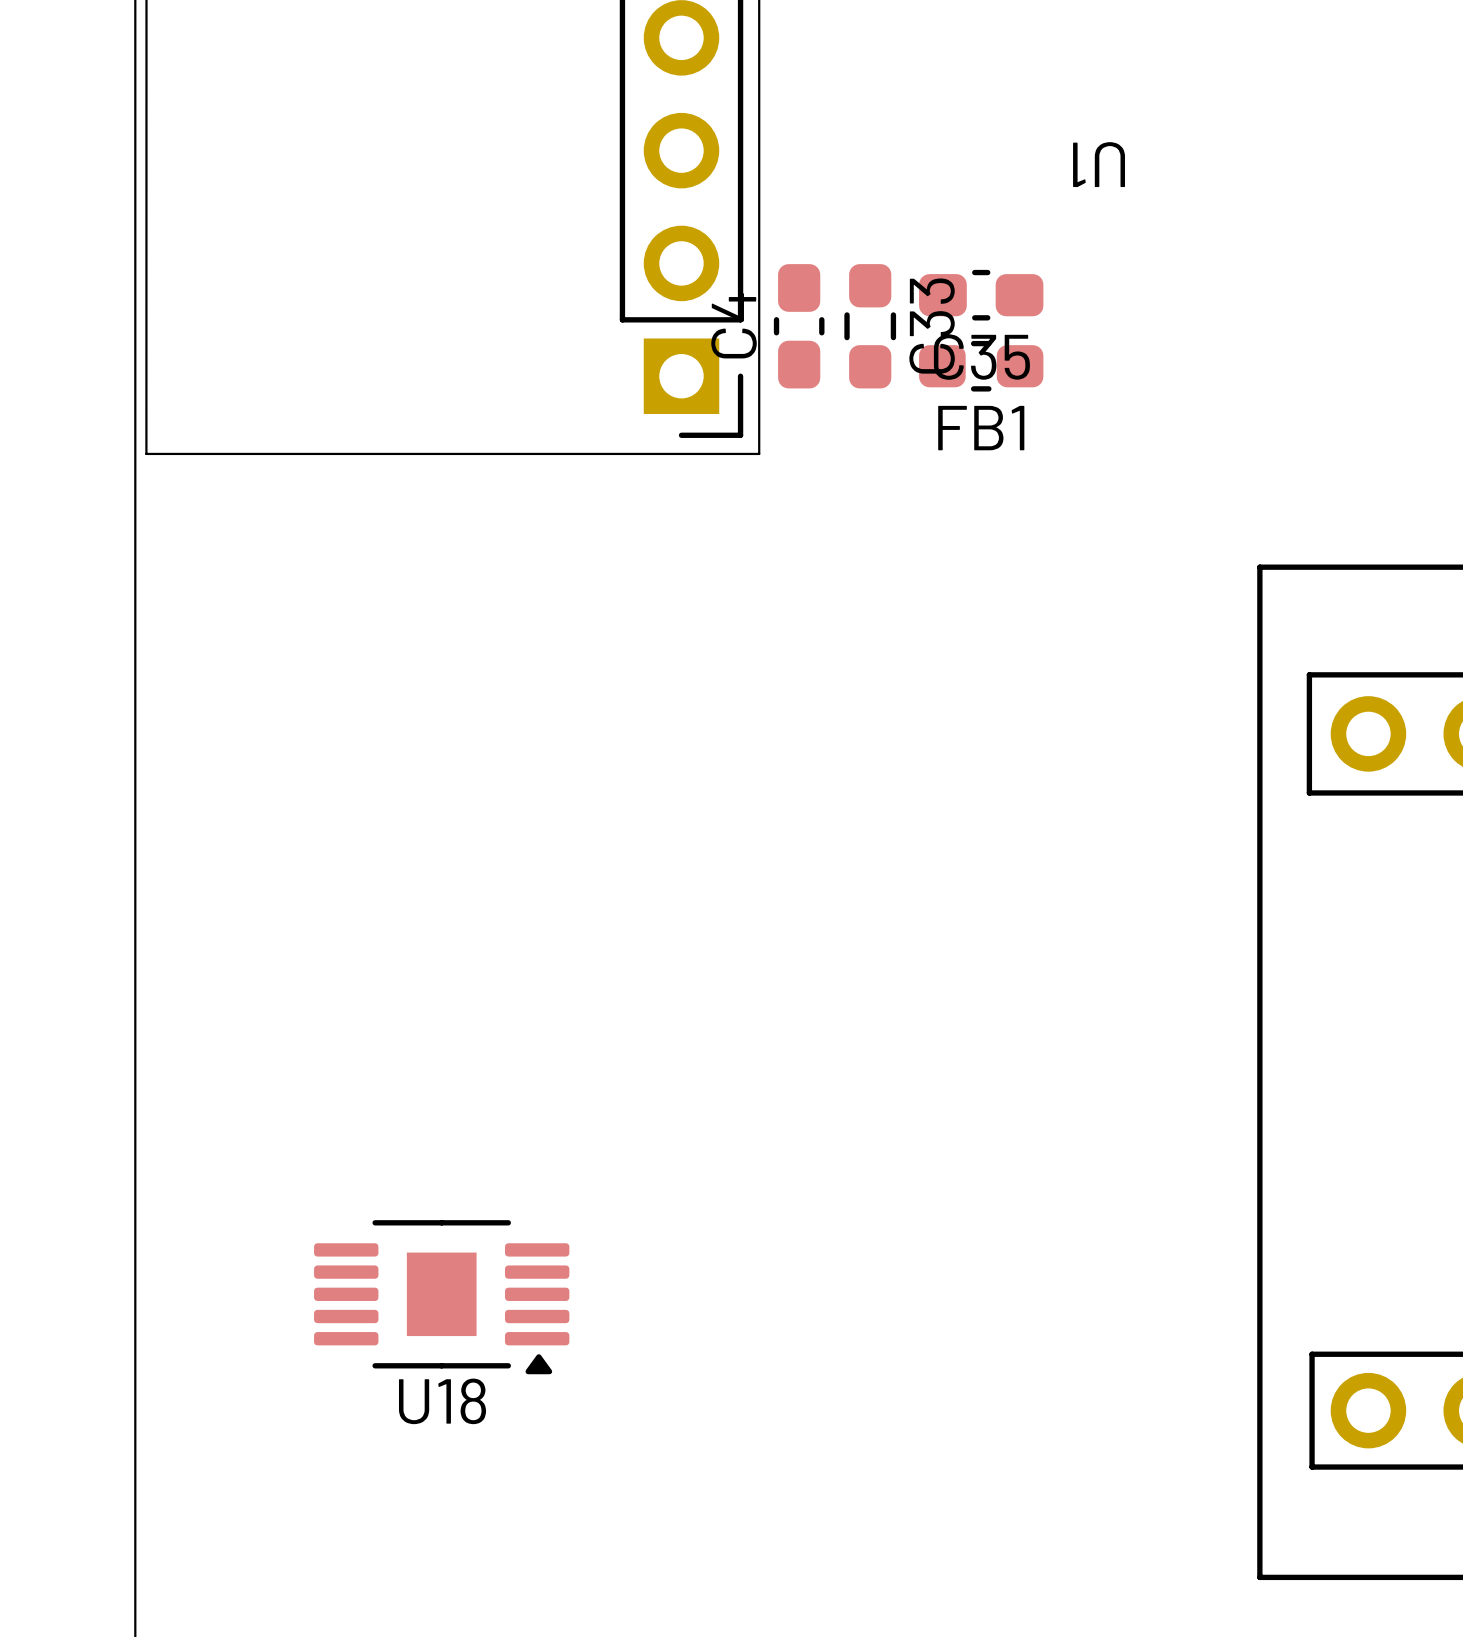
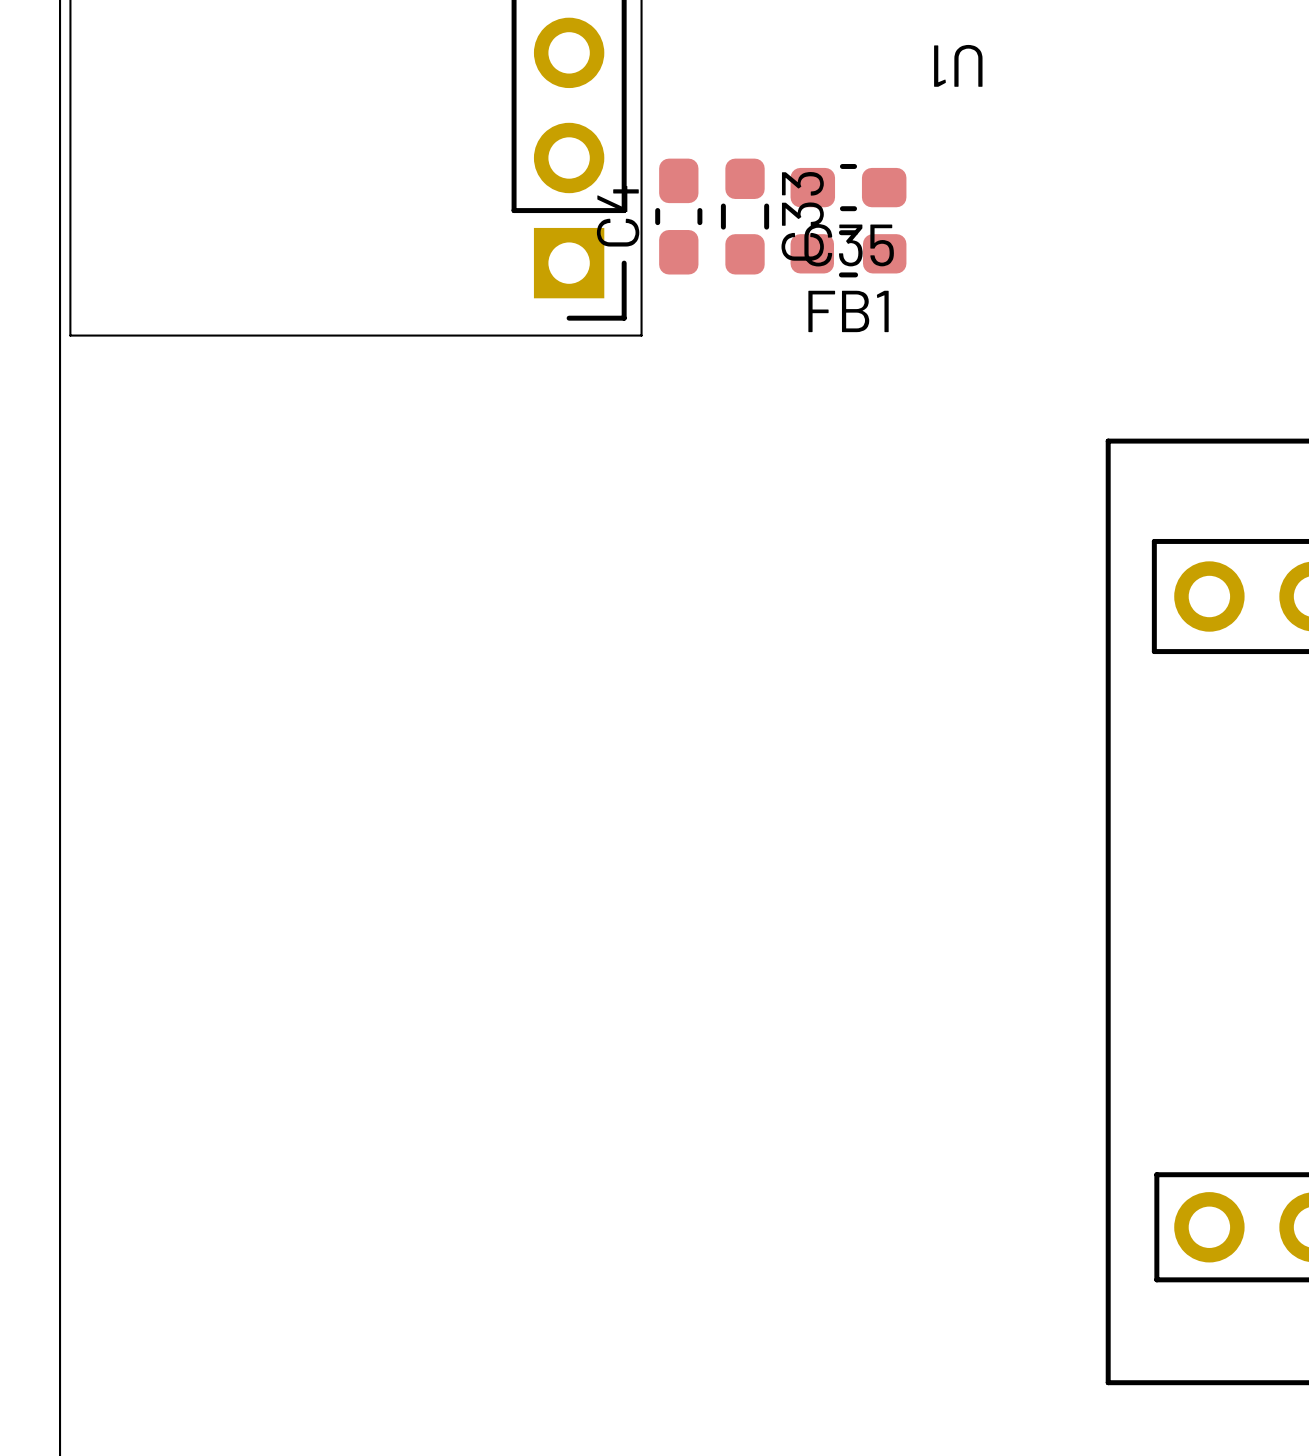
U18: (441, 1297) -> none

